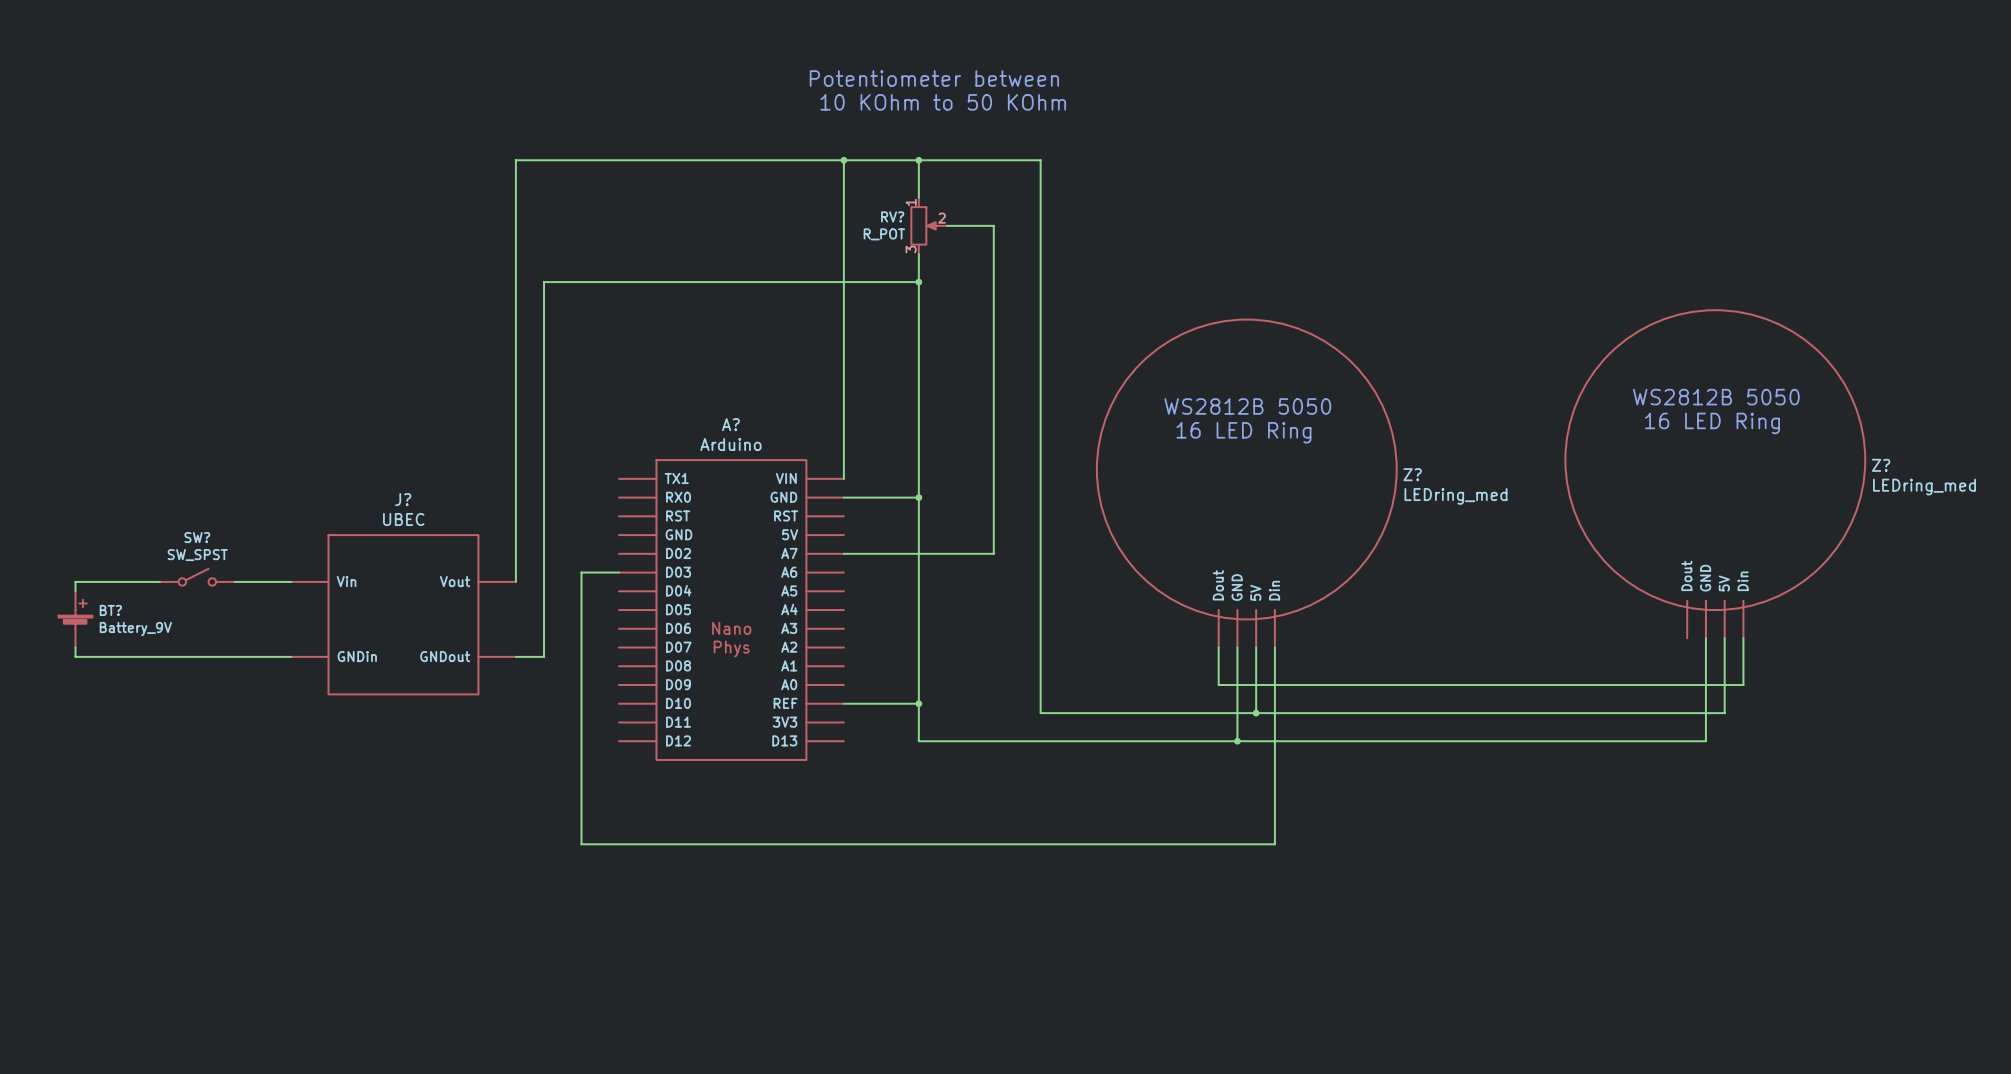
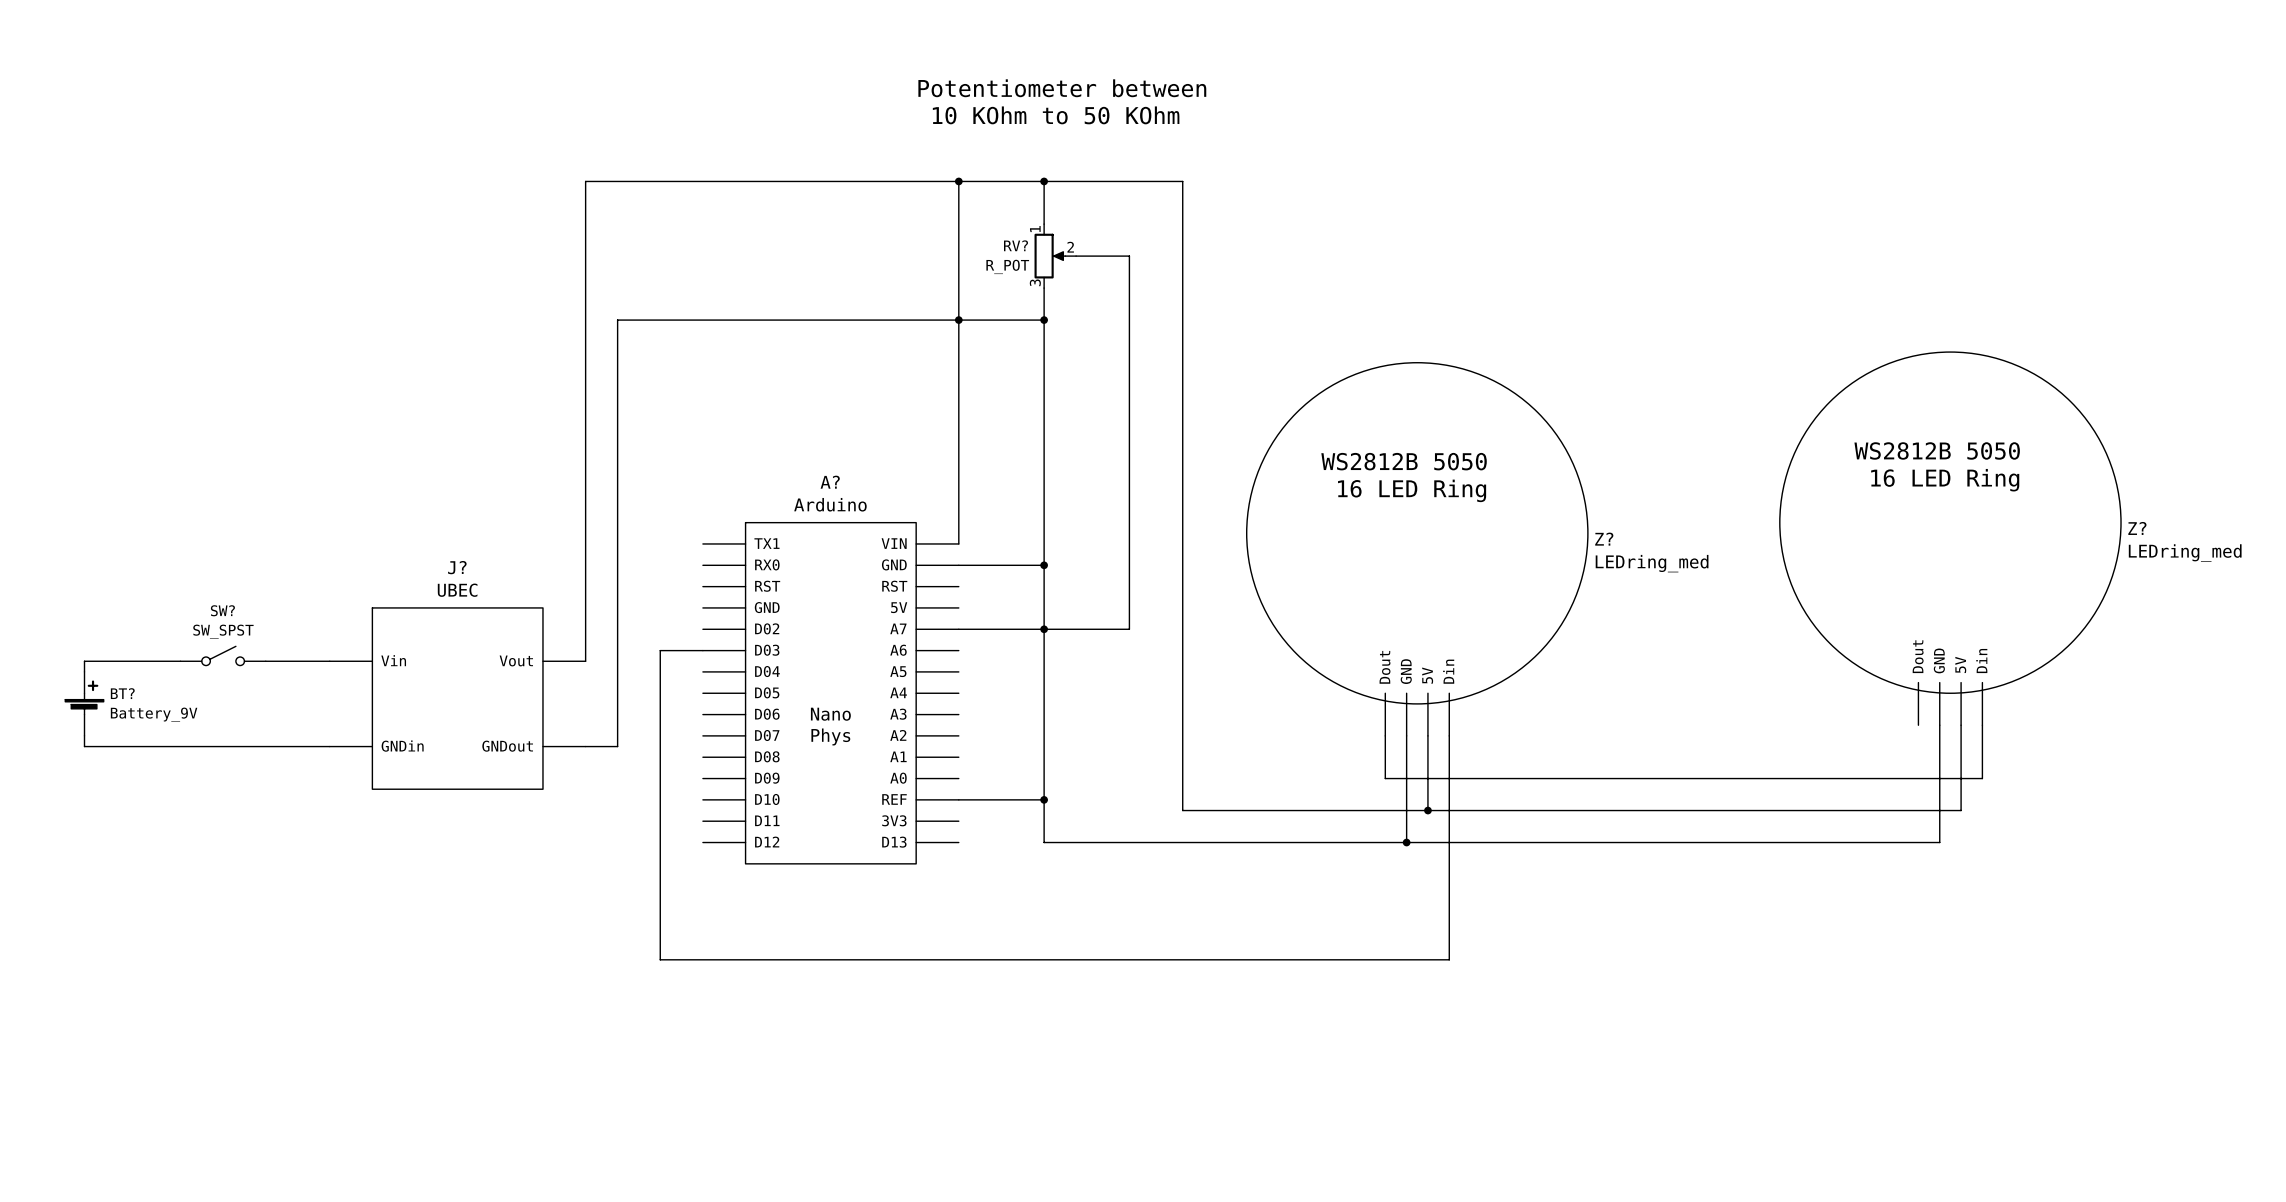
junction: none -> (958, 320)
junction: none -> (1044, 629)

